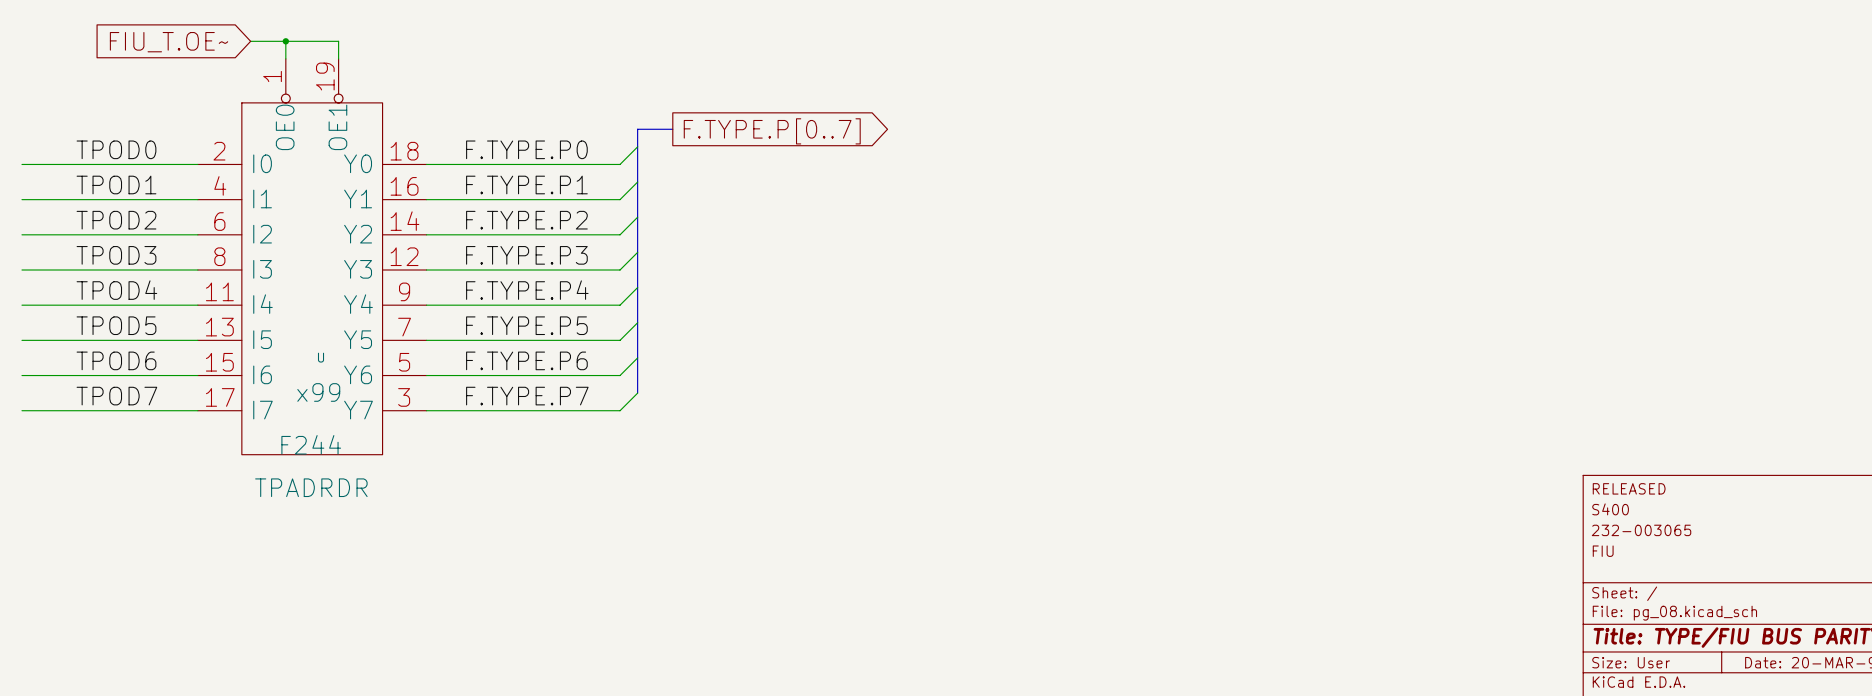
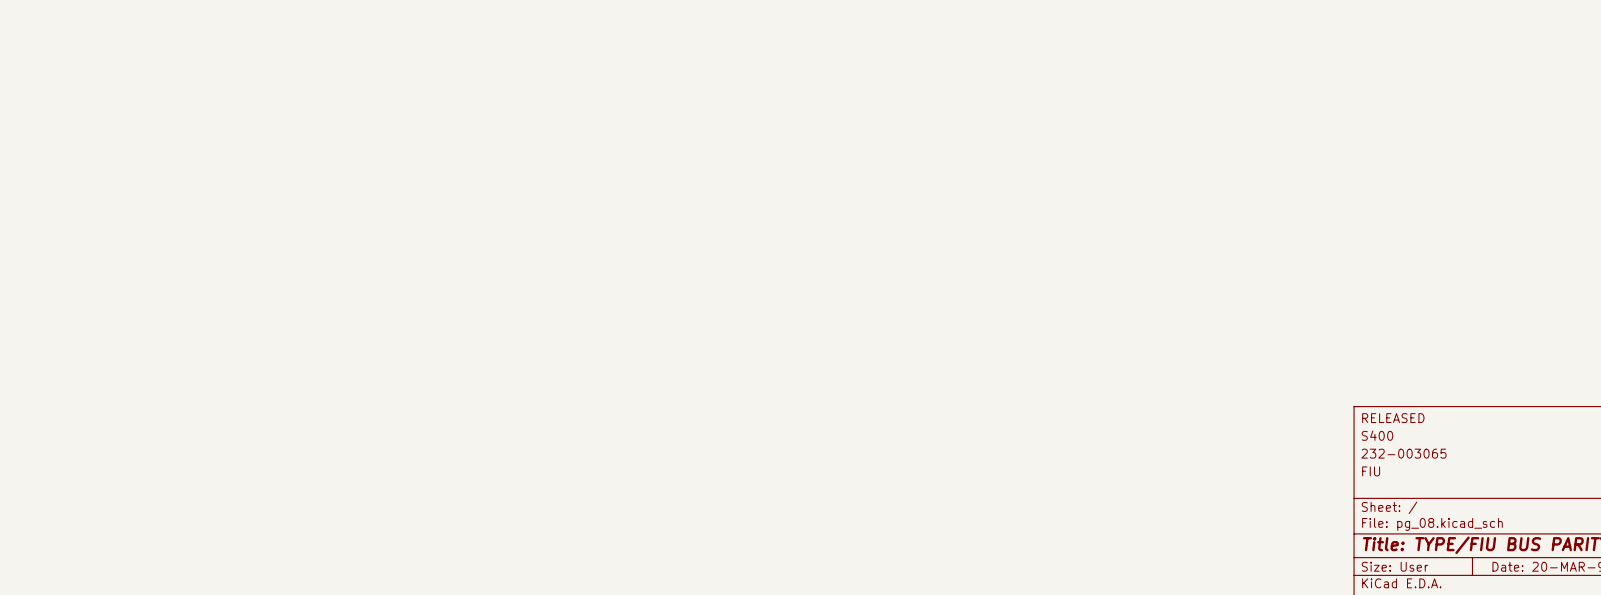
wire: (250, 41) (338, 41) (338, 58) -> none
wire: (285, 41) (285, 58) -> none
junction: (285, 41) -> none
global label: FIU_T.OE~ (169, 42) -> none
bus: (672, 129) (637, 129) (637, 393) -> none
global label: F.TYPE.P[0..7] (772, 131) -> none
wire: (637, 146) (620, 164) (426, 164) -> none
label: TPOD0 (116, 149) -> none
label: F.TYPE.P0 (526, 149) -> none
wire: (21, 164) (197, 164) -> none
wire: (637, 182) (620, 199) (426, 199) -> none
label: TPOD1 (116, 184) -> none
label: F.TYPE.P1 (526, 184) -> none
wire: (21, 199) (197, 199) -> none
wire: (637, 217) (620, 234) (426, 234) -> none
label: TPOD2 (116, 220) -> none
label: F.TYPE.P2 (526, 220) -> none
wire: (21, 234) (197, 234) -> none
wire: (637, 252) (620, 269) (426, 269) -> none
label: TPOD3 (116, 255) -> none
label: F.TYPE.P3 (526, 255) -> none
U: F244 (312, 256) -> none
wire: (21, 269) (197, 269) -> none
wire: (637, 287) (620, 305) (426, 305) -> none
label: TPOD4 (116, 290) -> none
label: F.TYPE.P4 (527, 290) -> none
wire: (21, 305) (197, 305) -> none
wire: (637, 322) (620, 340) (426, 340) -> none
label: TPOD5 (116, 325) -> none
label: F.TYPE.P5 (526, 325) -> none
wire: (21, 340) (197, 340) -> none
wire: (637, 357) (620, 375) (426, 375) -> none
label: TPOD6 (116, 360) -> none
label: F.TYPE.P6 (526, 360) -> none
wire: (21, 375) (197, 375) -> none
wire: (637, 393) (620, 410) (426, 410) -> none
label: TPOD7 (116, 396) -> none
label: F.TYPE.P7 (527, 396) -> none
wire: (21, 410) (197, 410) -> none

